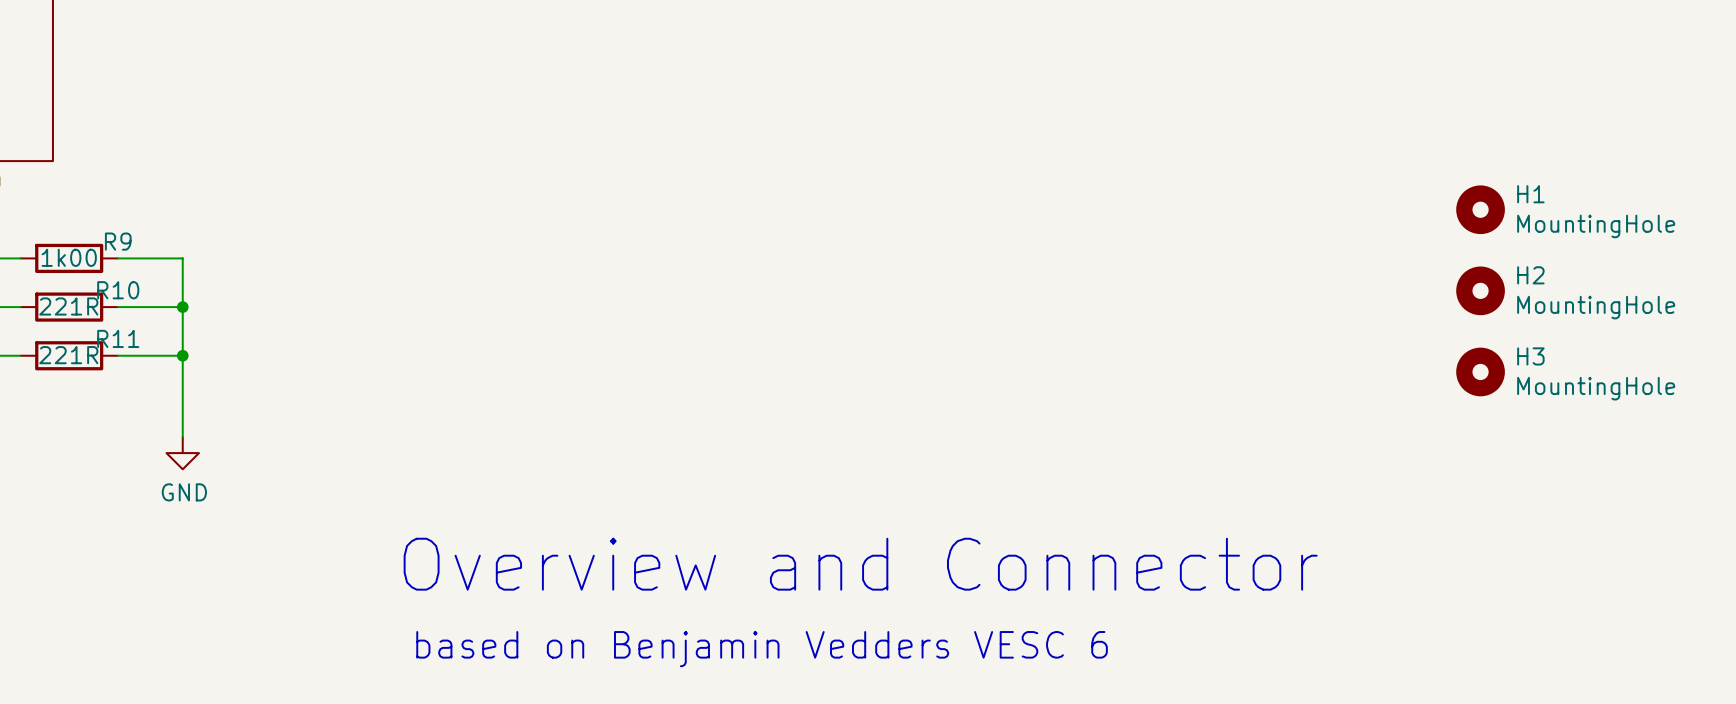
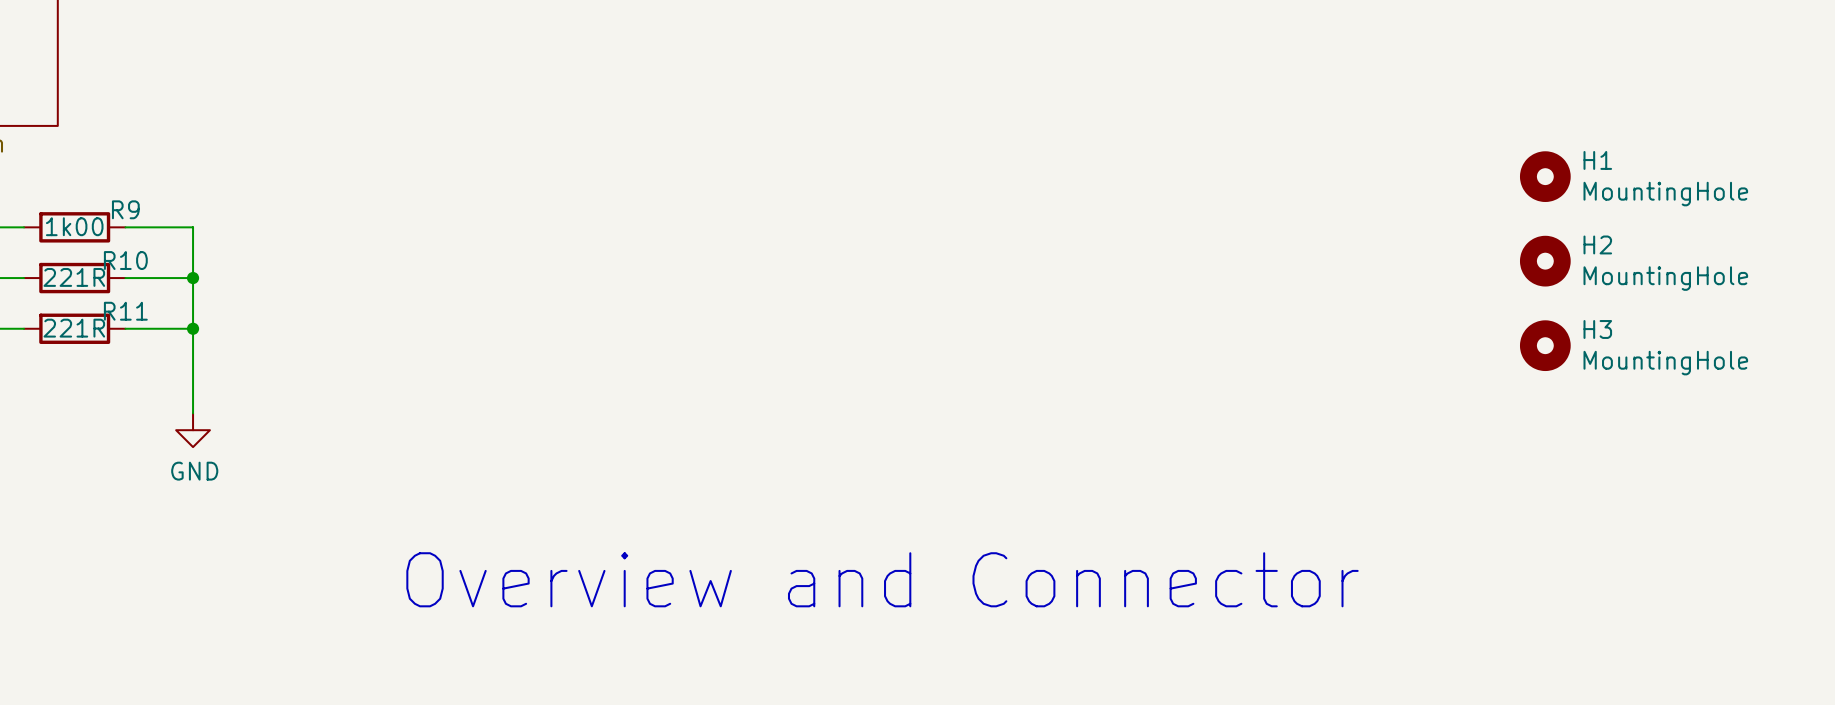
text position: Overview and Connector (860, 564) -> Overview and Connector (882, 579)
text: based on Benjamin Vedders VESC 6 (762, 649) -> none

